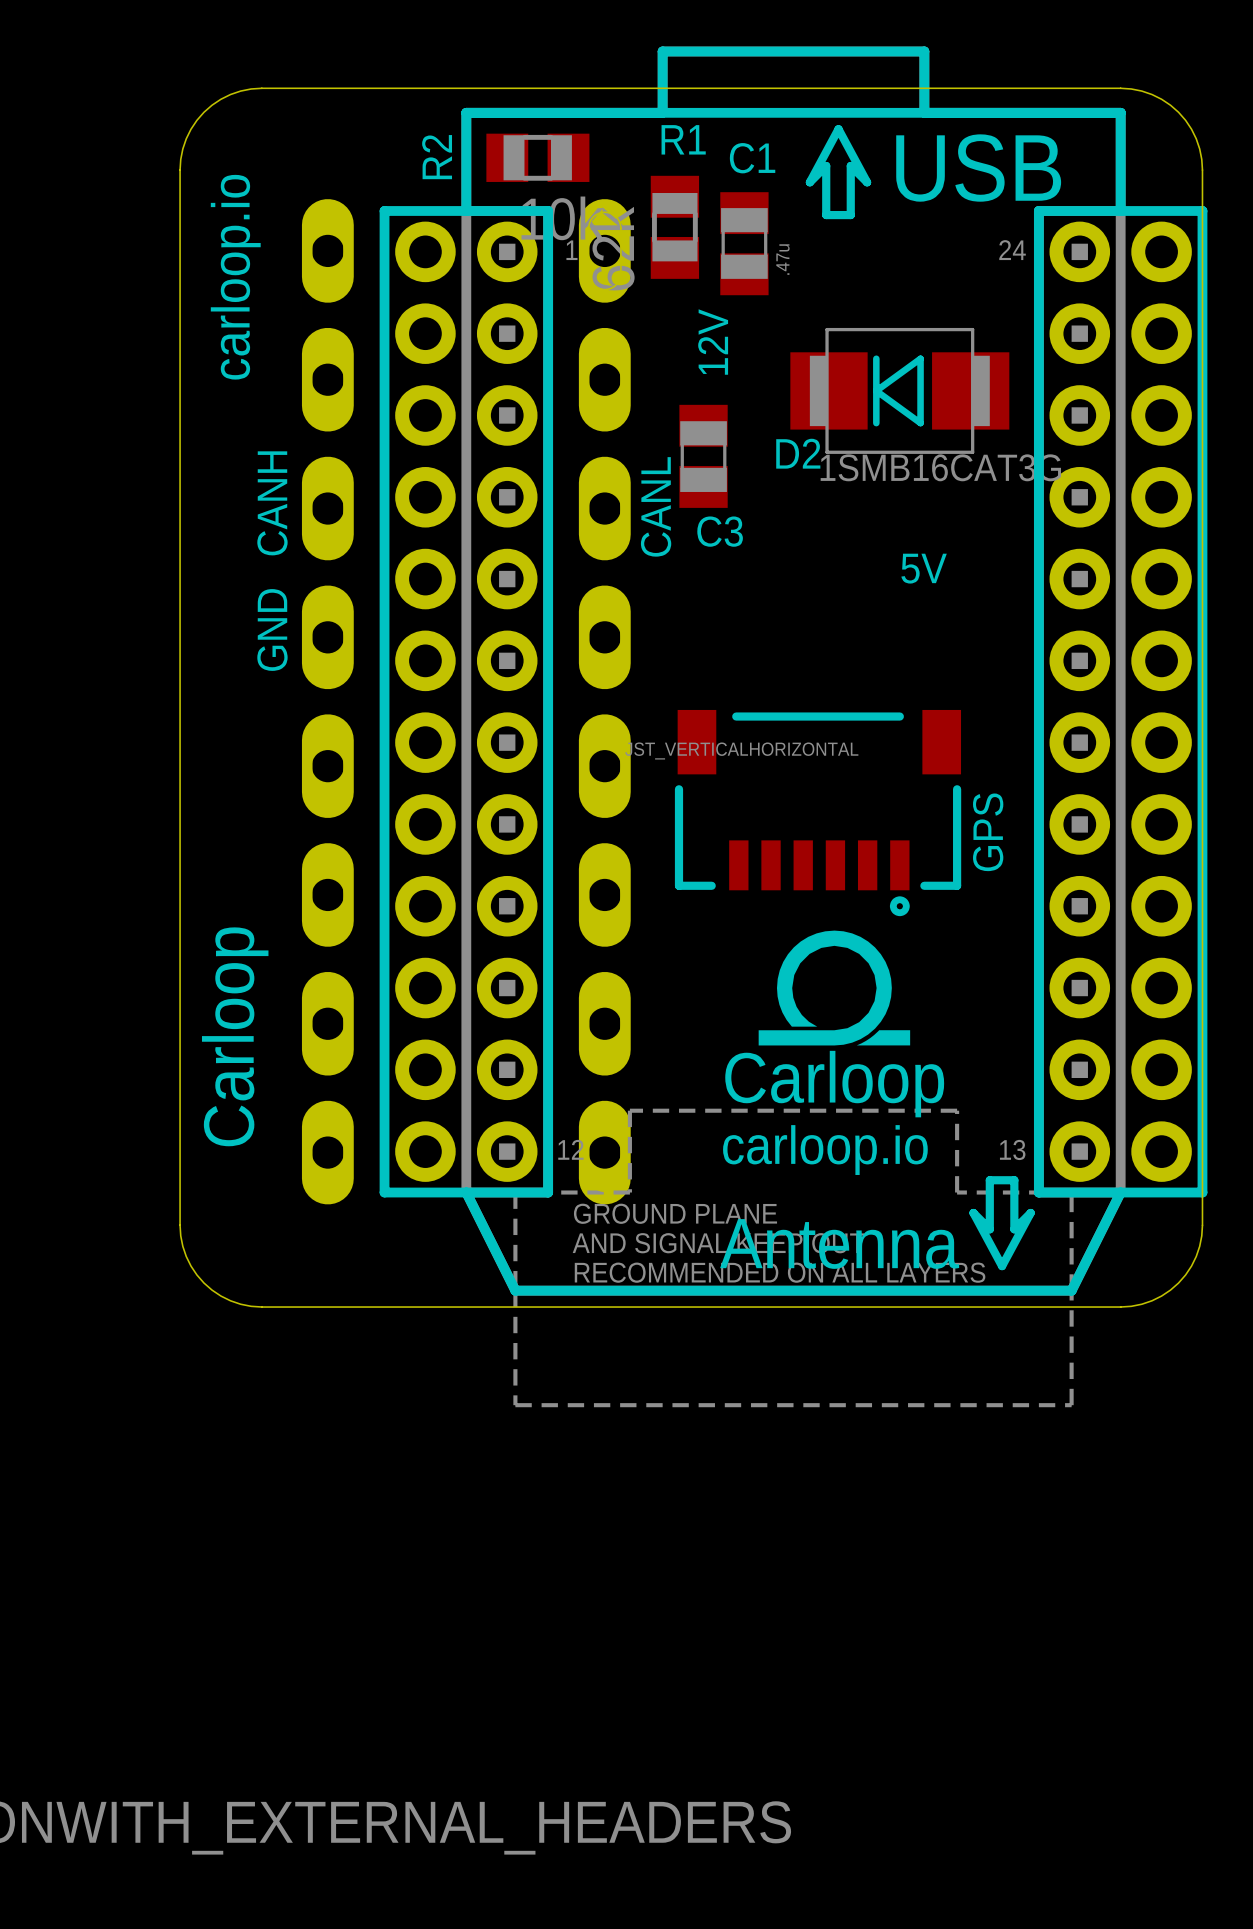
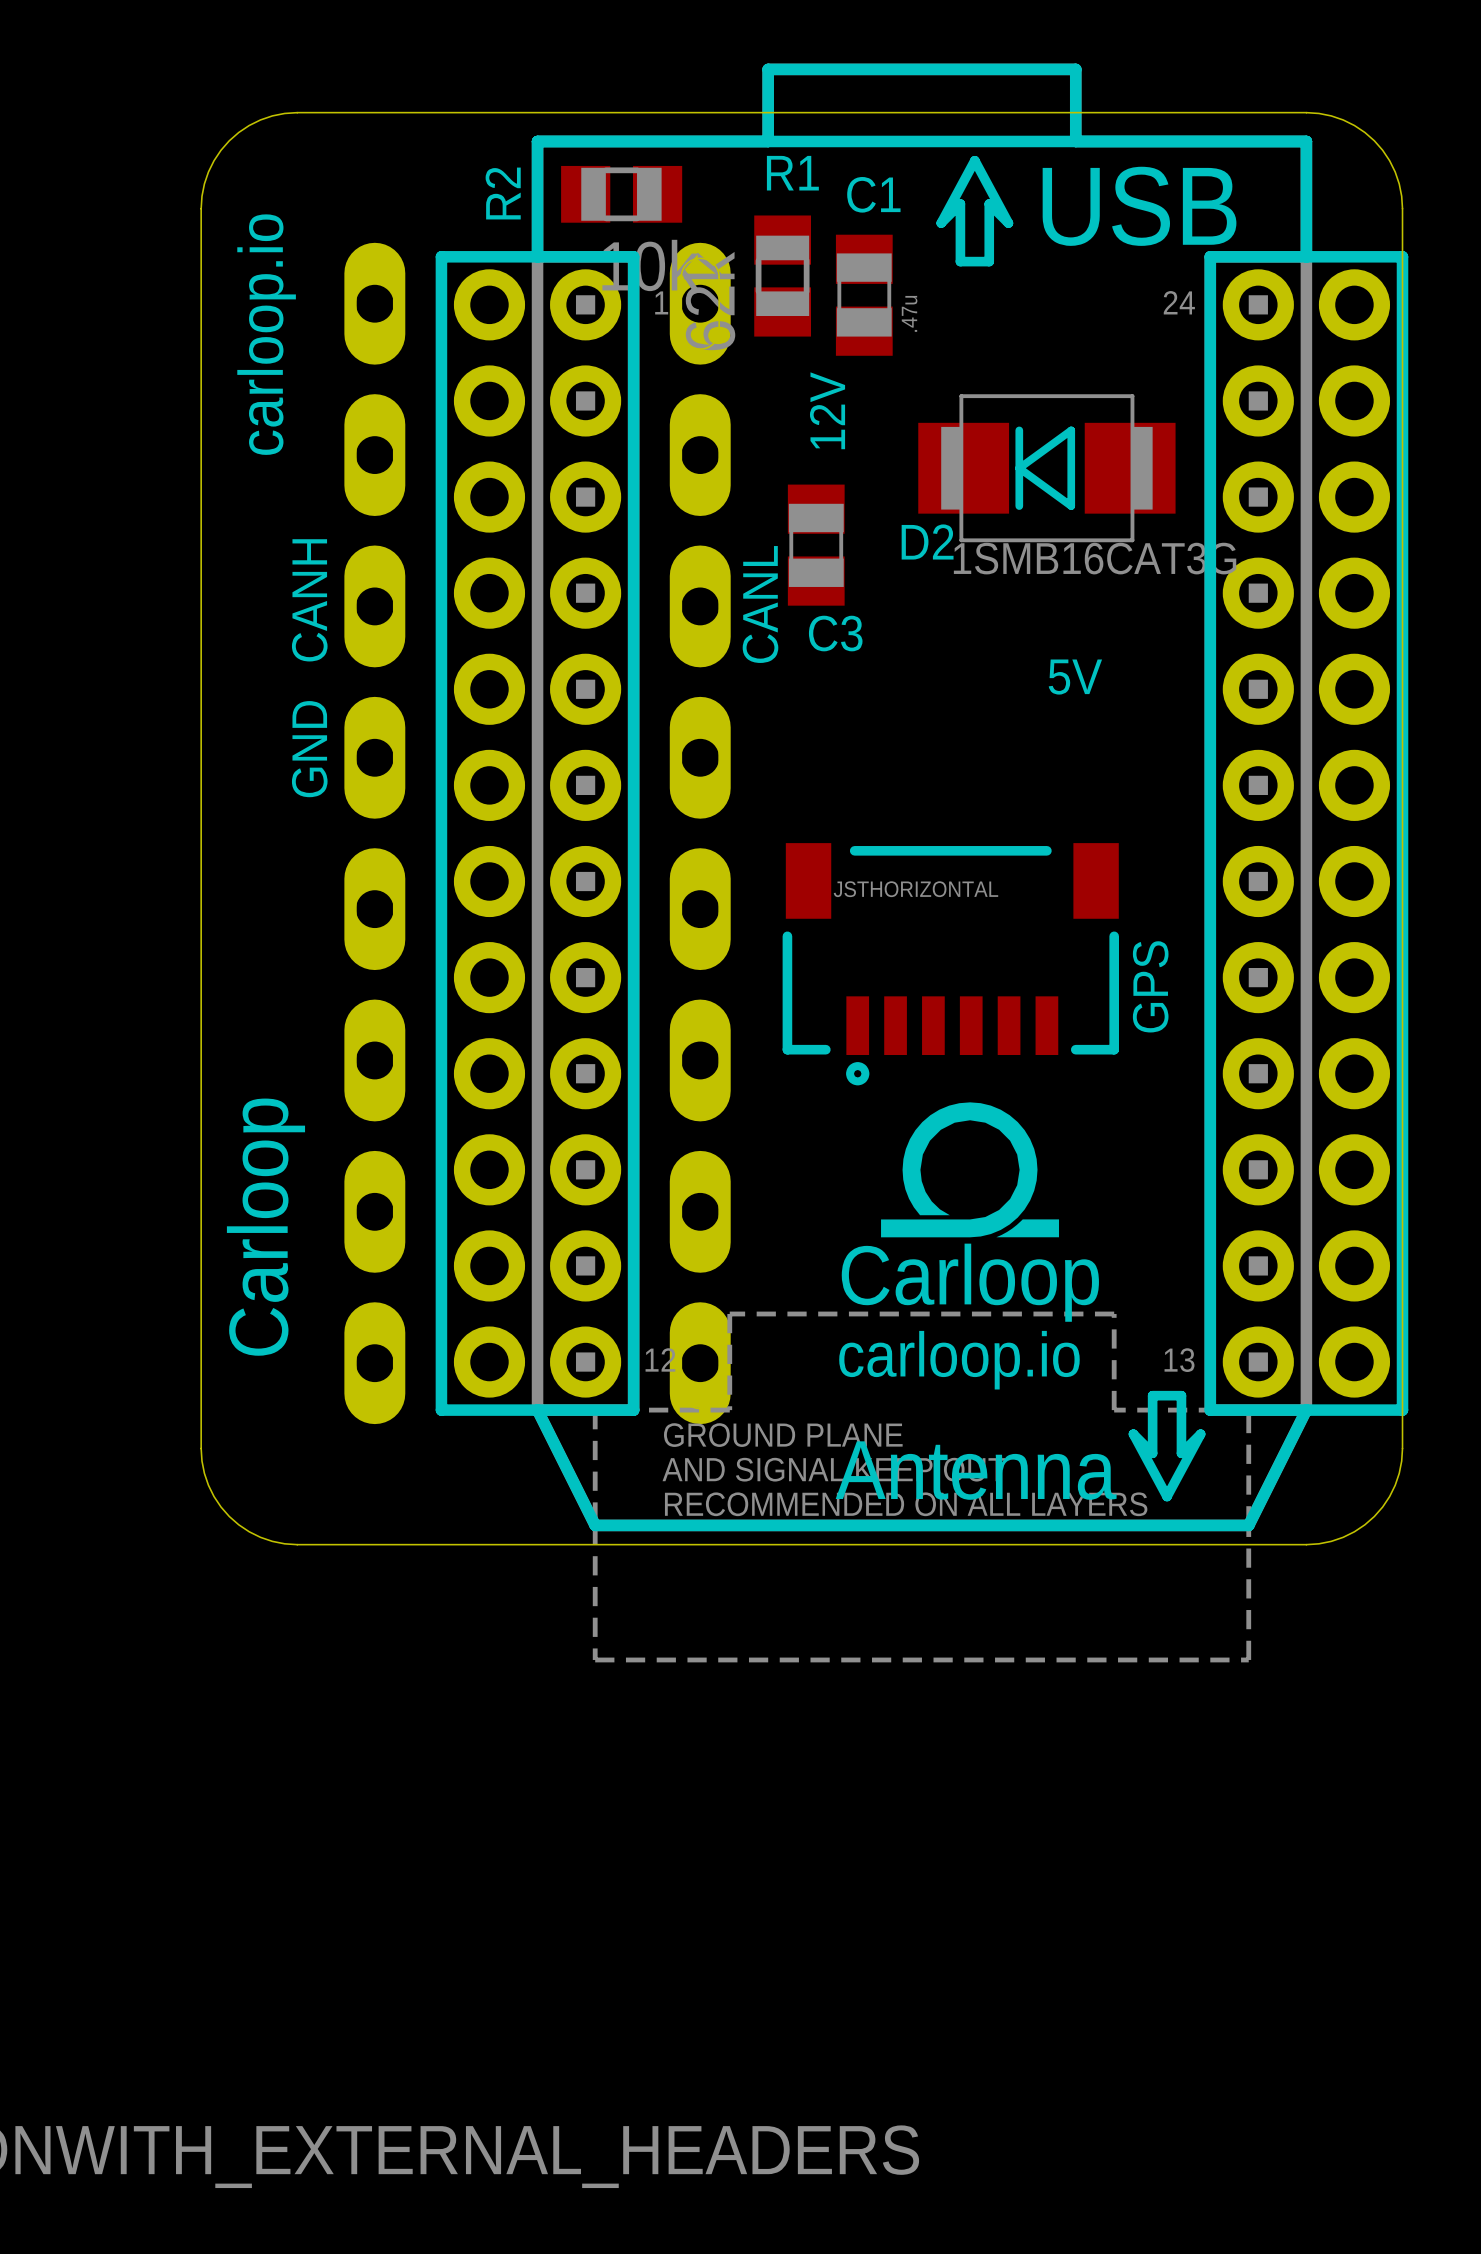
GPS footprint: [674, 709, 962, 917] -> [782, 843, 1119, 1086]
GPS value: JST_VERTICALHORIZONTAL (741, 750) -> JSTHORIZONTAL (915, 889)

